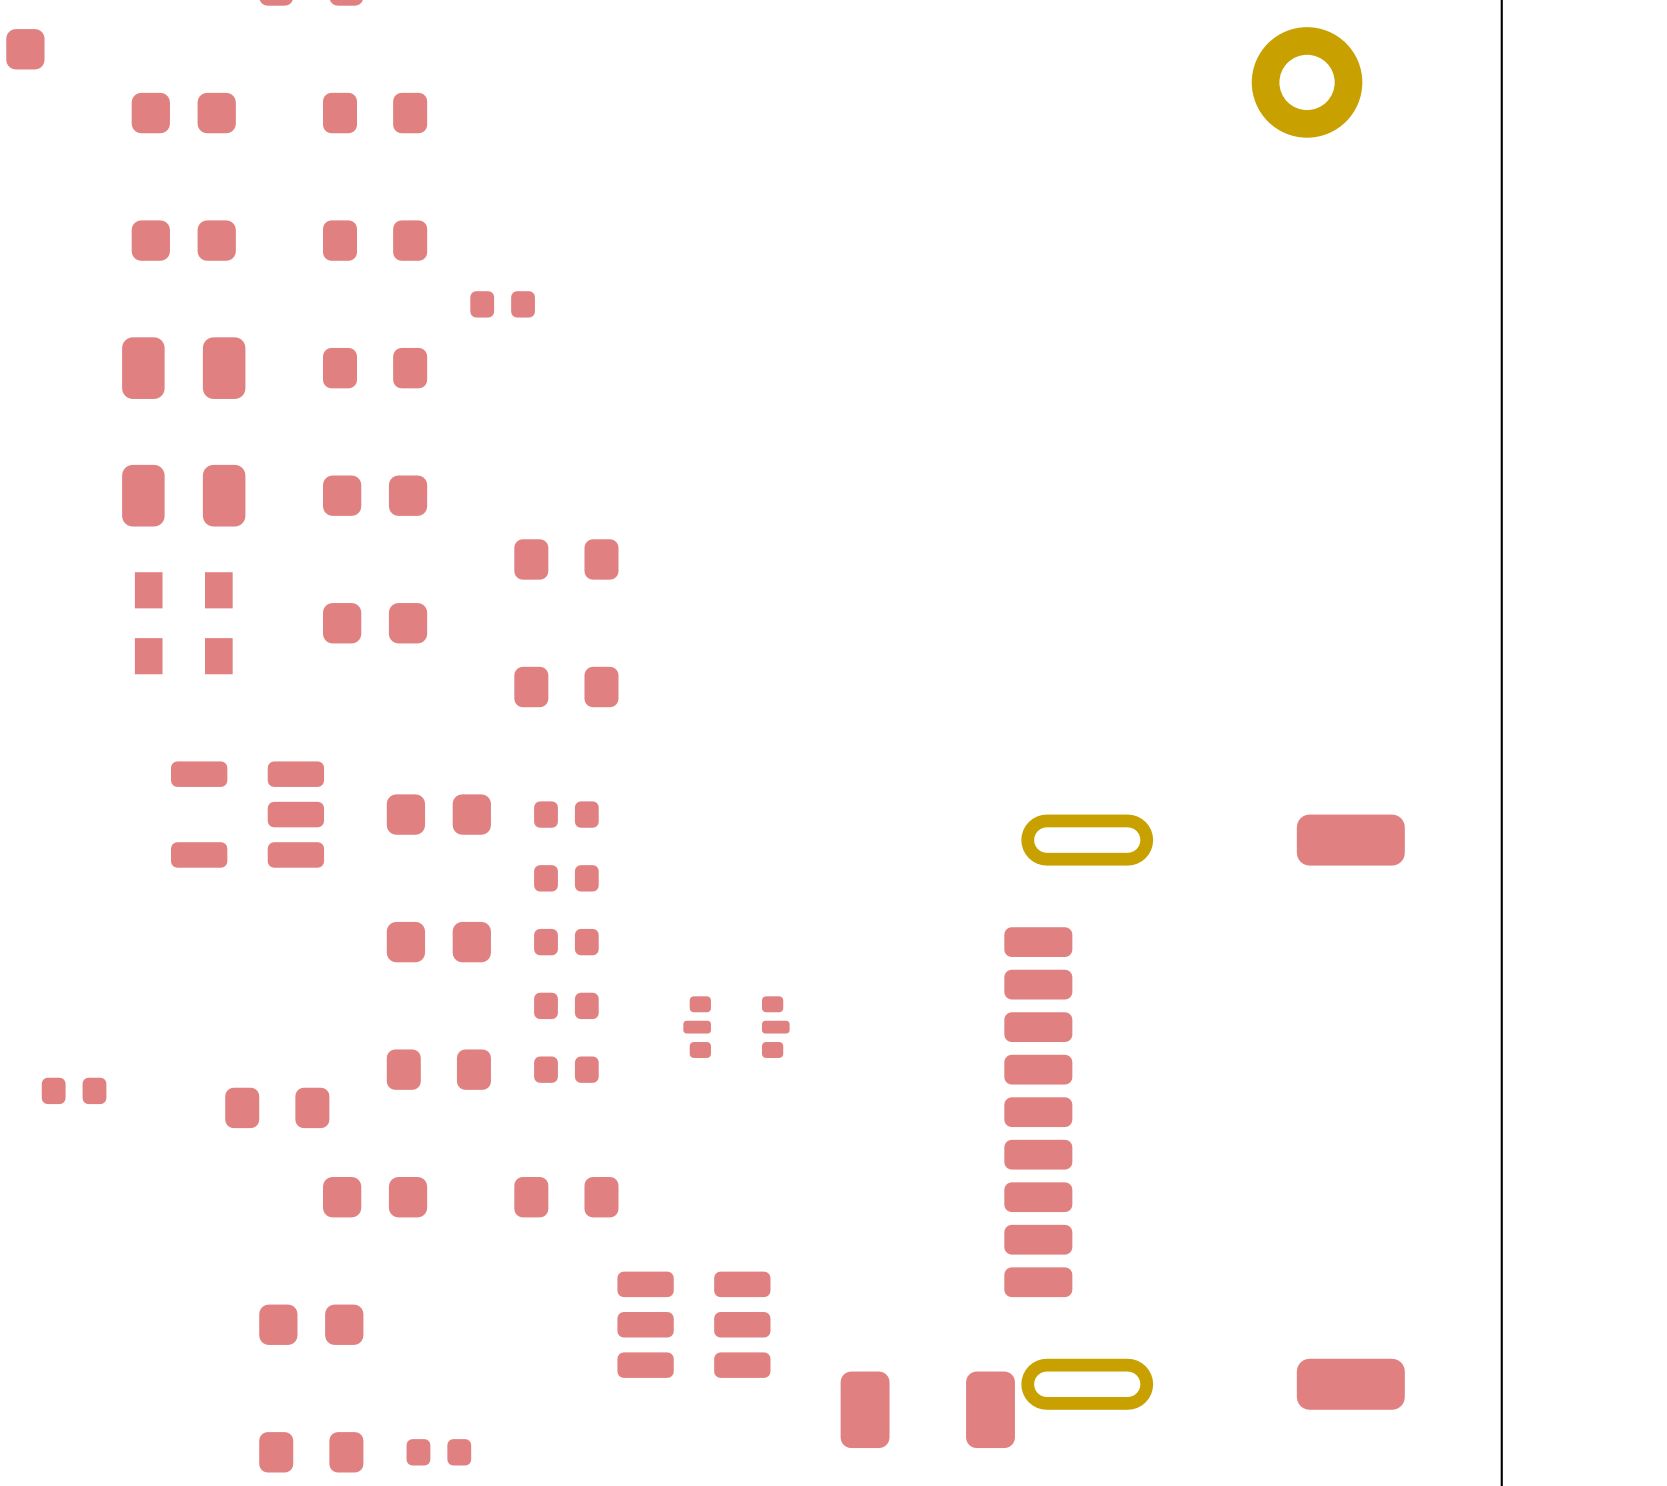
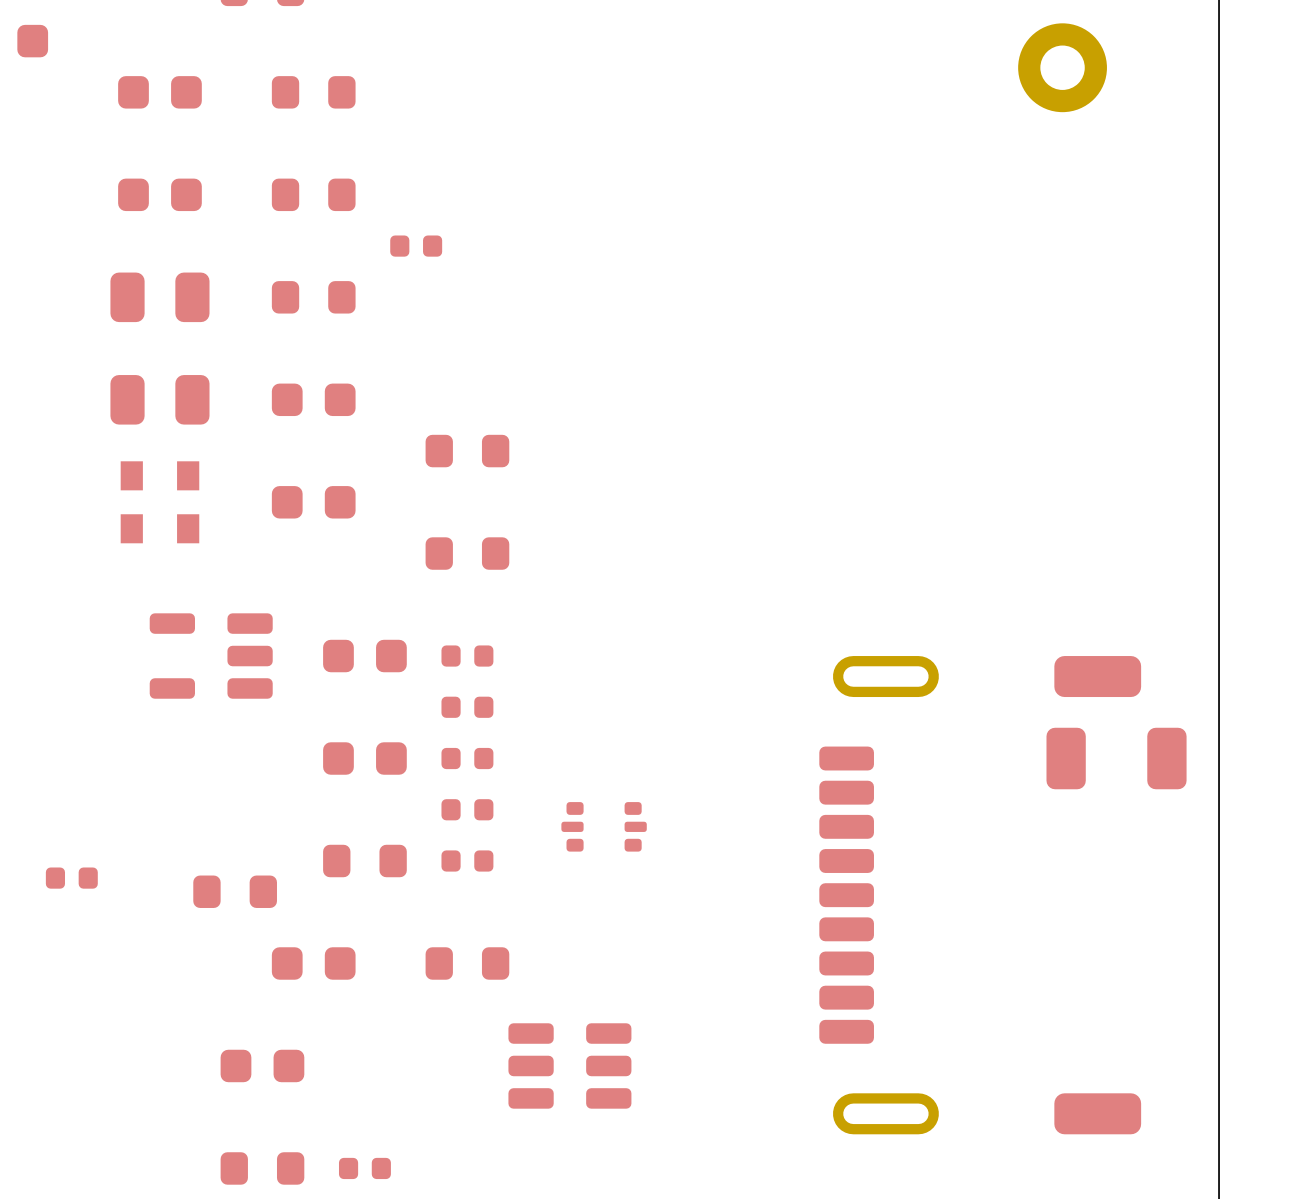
part position: (927, 1409) -> (1116, 758)

